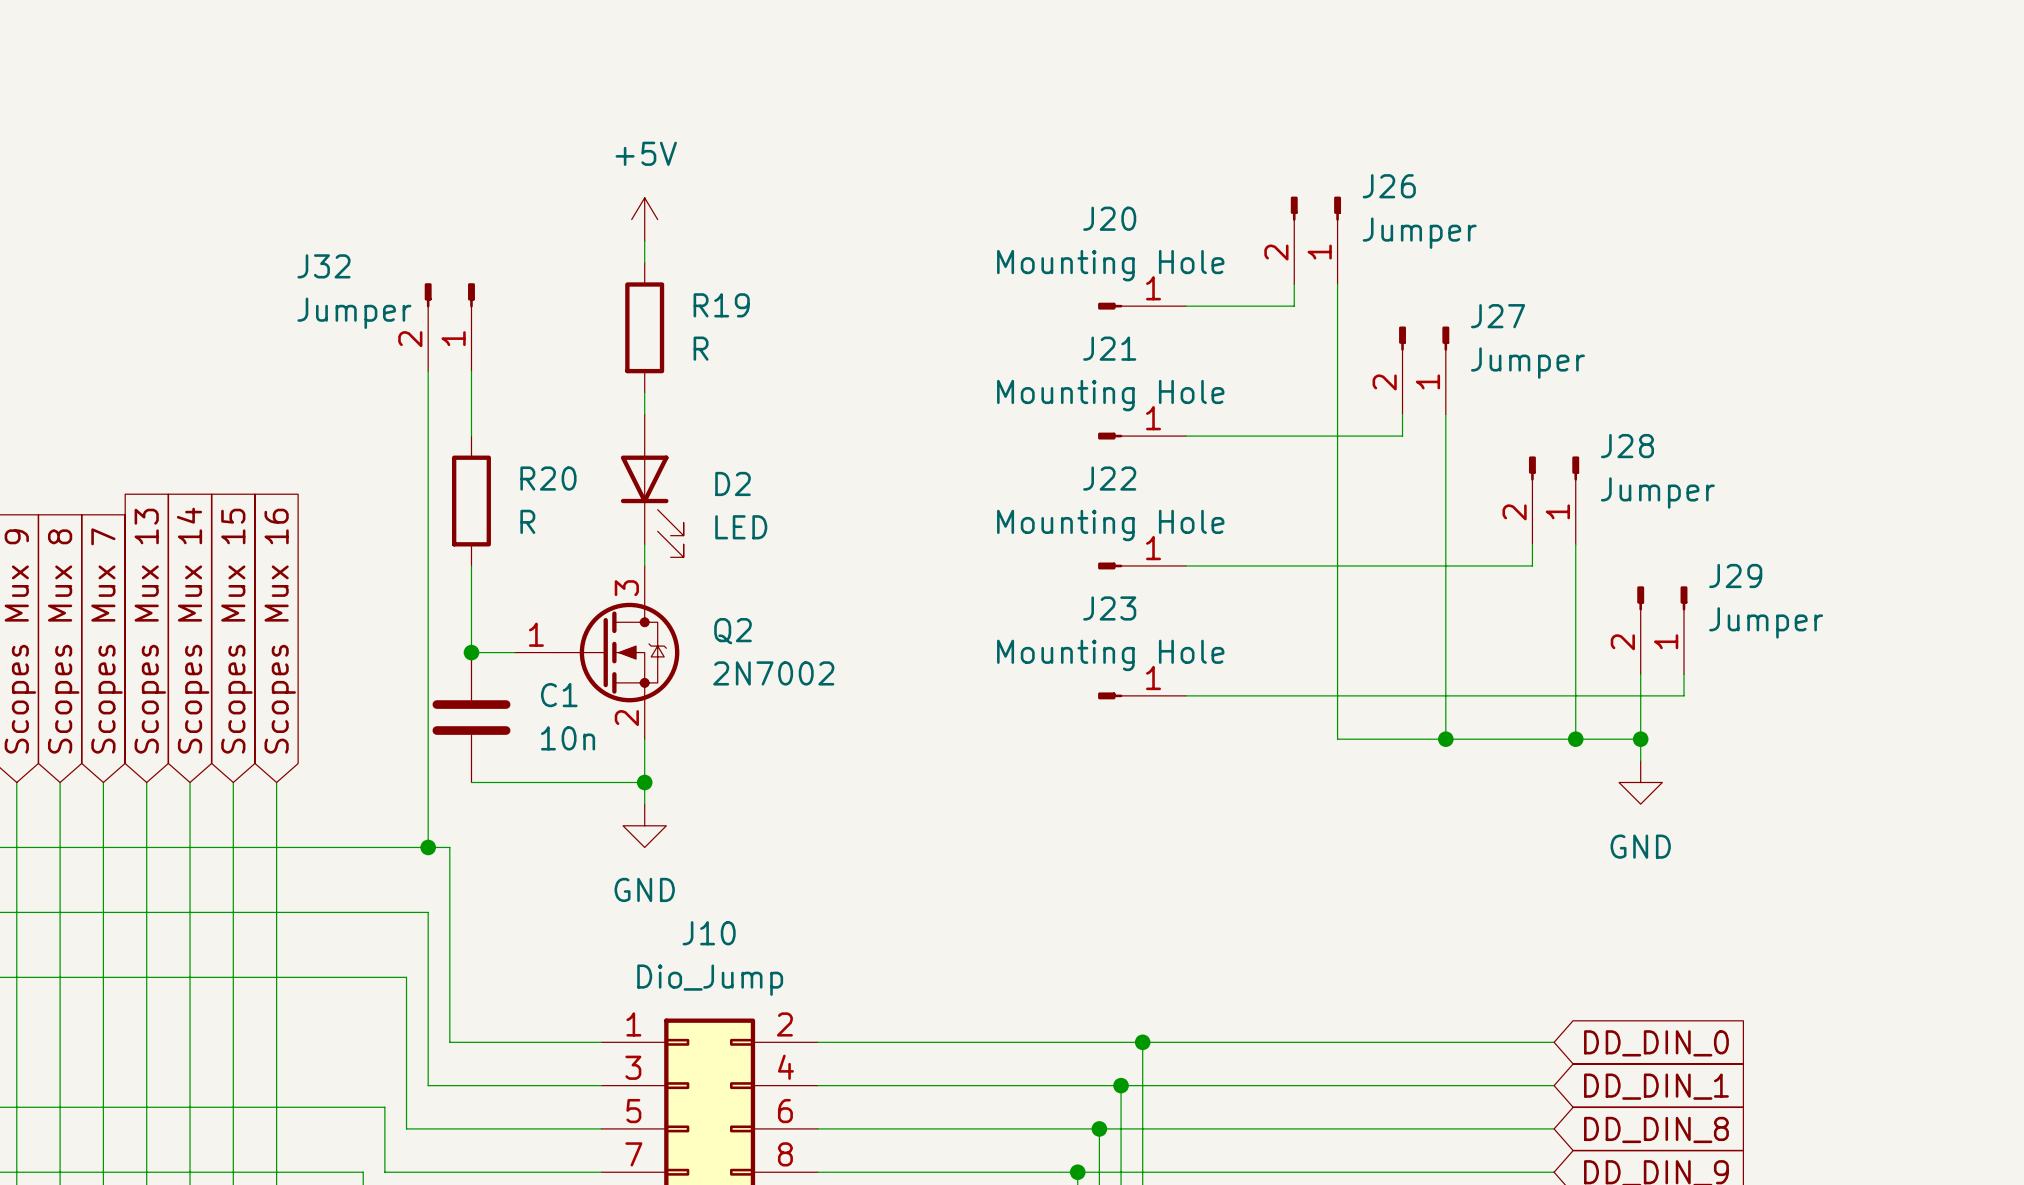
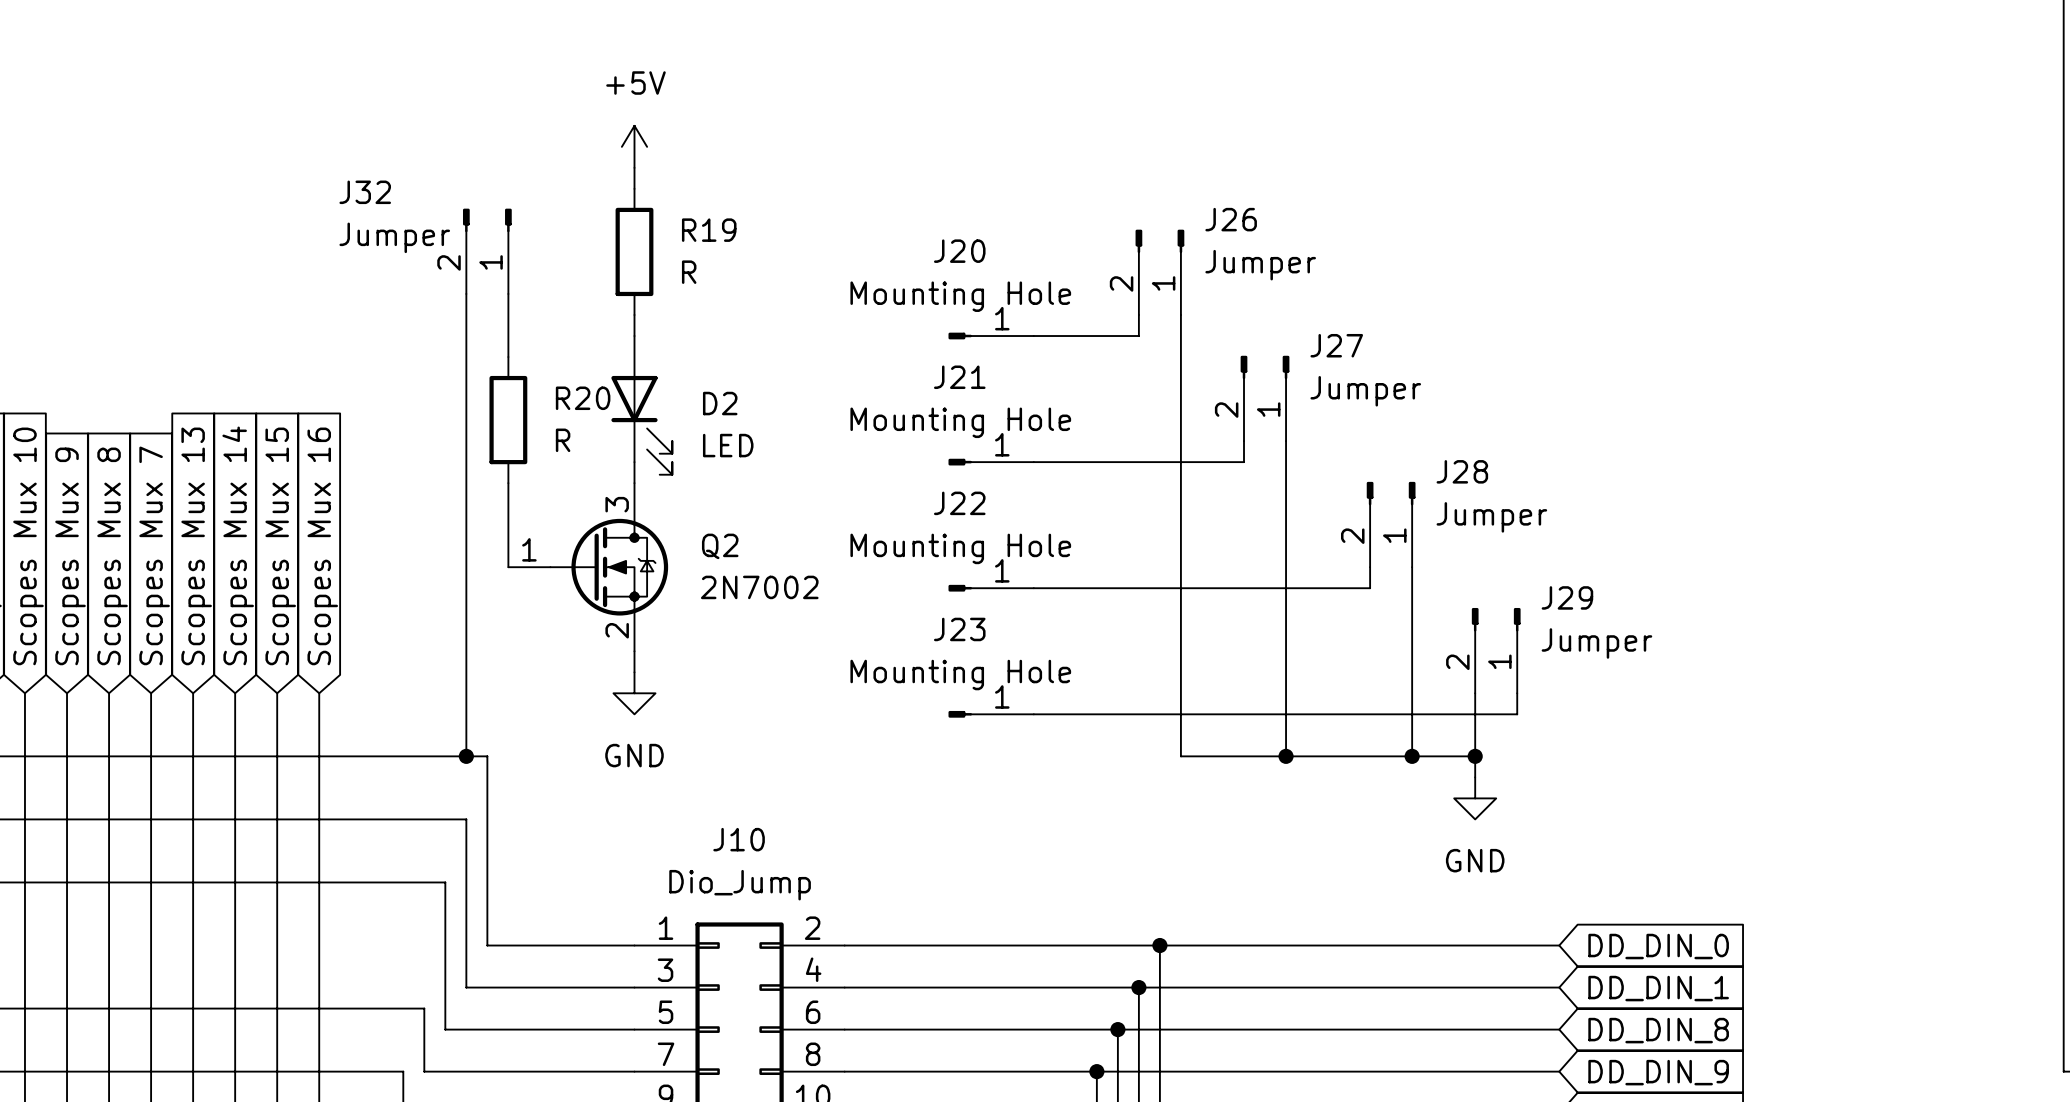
power symbol position: +5V (644, 219) -> +5V (634, 146)
J26 position: (1315, 240) -> (1159, 272)
wire: (644, 241) (644, 262) -> (634, 167) (634, 188)
wire: (1294, 284) (1294, 306) (1186, 306) -> (1138, 314) (1138, 336) (1033, 336)
wire: (1337, 284) (1337, 739) (1640, 739) -> (1180, 314) (1180, 756) (1475, 756)
J20 position: (1142, 306) -> (991, 336)
R19 position: (644, 327) -> (634, 251)
J27 position: (1424, 370) -> (1265, 398)
wire: (644, 392) (644, 414) -> (634, 314) (634, 336)
wire: (1402, 414) (1402, 436) (1186, 436) -> (1244, 441) (1244, 462) (1033, 462)
wire: (1445, 414) (1445, 739) -> (1286, 441) (1286, 756)
J21 position: (1142, 436) -> (991, 462)
D2 position: (652, 485) -> (641, 405)
J28 position: (1554, 500) -> (1391, 524)
wire: (644, 544) (644, 565) -> (634, 462) (634, 483)
wire: (1532, 544) (1532, 565) (1186, 565) -> (1370, 567) (1370, 588) (1033, 588)
wire: (1575, 544) (1575, 739) -> (1412, 567) (1412, 756)
J22 position: (1142, 565) -> (991, 588)
J29 position: (1662, 630) -> (1496, 650)
junction: (471, 652) -> none
Q2 position: (597, 652) -> (588, 567)
wire: (1640, 674) (1640, 760) -> (1475, 693) (1475, 777)
wire: (1683, 674) (1683, 695) (1186, 695) -> (1517, 693) (1517, 714) (1033, 714)
J23 position: (1142, 695) -> (991, 714)
C1: 10n (471, 717) -> none
wire: none -> (634, 651) (634, 672)
wire: (644, 739) (644, 804) -> none
junction: (1445, 739) -> none
junction: (1575, 739) -> none
junction: (1640, 739) -> none
wire: (471, 782) (644, 782) -> none
junction: (644, 782) -> none
power symbol position: GND (1640, 782) -> GND (1475, 798)
power symbol position: GND (644, 825) -> GND (634, 693)
junction: none -> (1286, 756)
junction: none -> (1412, 756)
junction: none -> (1475, 756)

